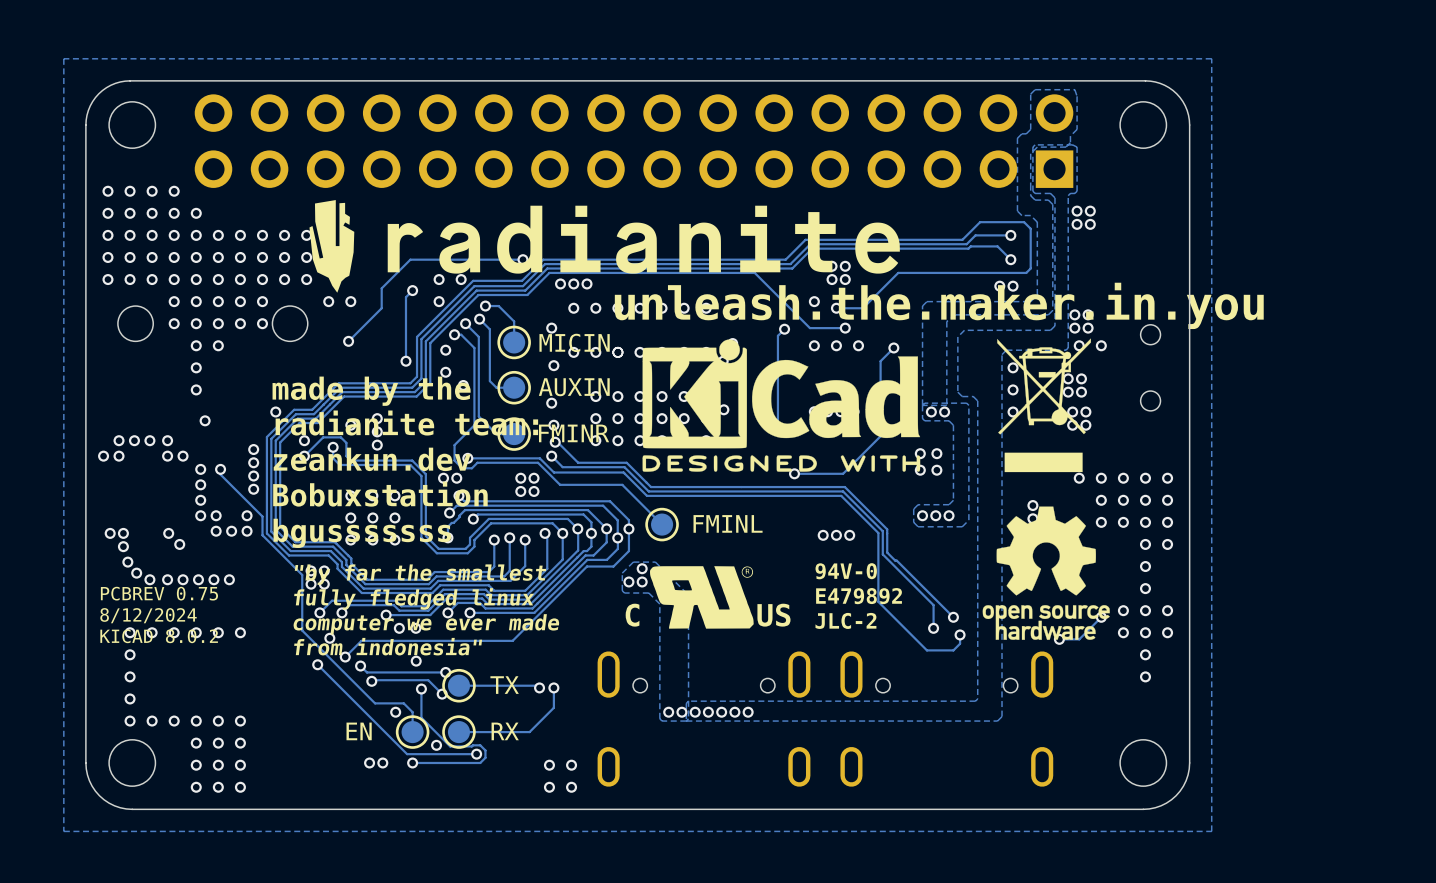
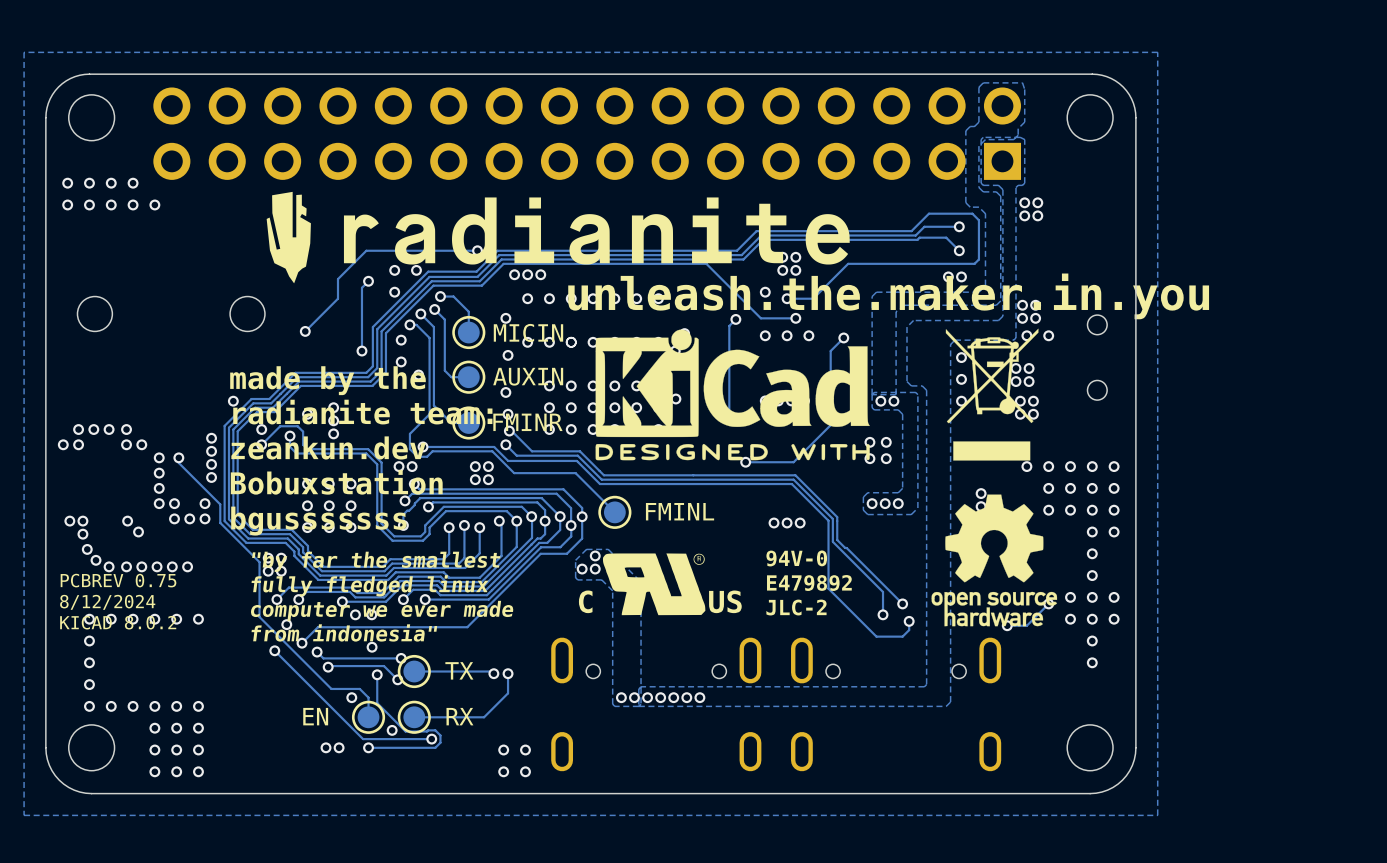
via: (107, 235) -> none
via: (130, 235) -> none
via: (152, 235) -> none
via: (174, 235) -> none
via: (196, 235) -> none
via: (218, 235) -> none
via: (240, 235) -> none
via: (262, 235) -> none
via: (284, 235) -> none
via: (306, 235) -> none
via: (107, 257) -> none
via: (130, 257) -> none
via: (152, 257) -> none
via: (174, 257) -> none
via: (196, 257) -> none
via: (218, 257) -> none
via: (240, 257) -> none
via: (262, 257) -> none
via: (284, 257) -> none
via: (306, 257) -> none
via: (107, 279) -> none
via: (130, 279) -> none
via: (152, 279) -> none
via: (174, 279) -> none
via: (196, 279) -> none
via: (218, 279) -> none
via: (240, 279) -> none
via: (262, 279) -> none
via: (284, 279) -> none
via: (306, 279) -> none
via: (174, 301) -> none
via: (196, 301) -> none
via: (218, 301) -> none
via: (240, 301) -> none
via: (262, 301) -> none
via: (328, 301) -> none
via: (350, 301) -> none
via: (174, 323) -> none
via: (196, 323) -> none
via: (218, 323) -> none
via: (240, 323) -> none
via: (262, 323) -> none
via: (196, 345) -> none
via: (218, 345) -> none
via: (196, 367) -> none
via: (196, 389) -> none
via: (205, 420) -> none

